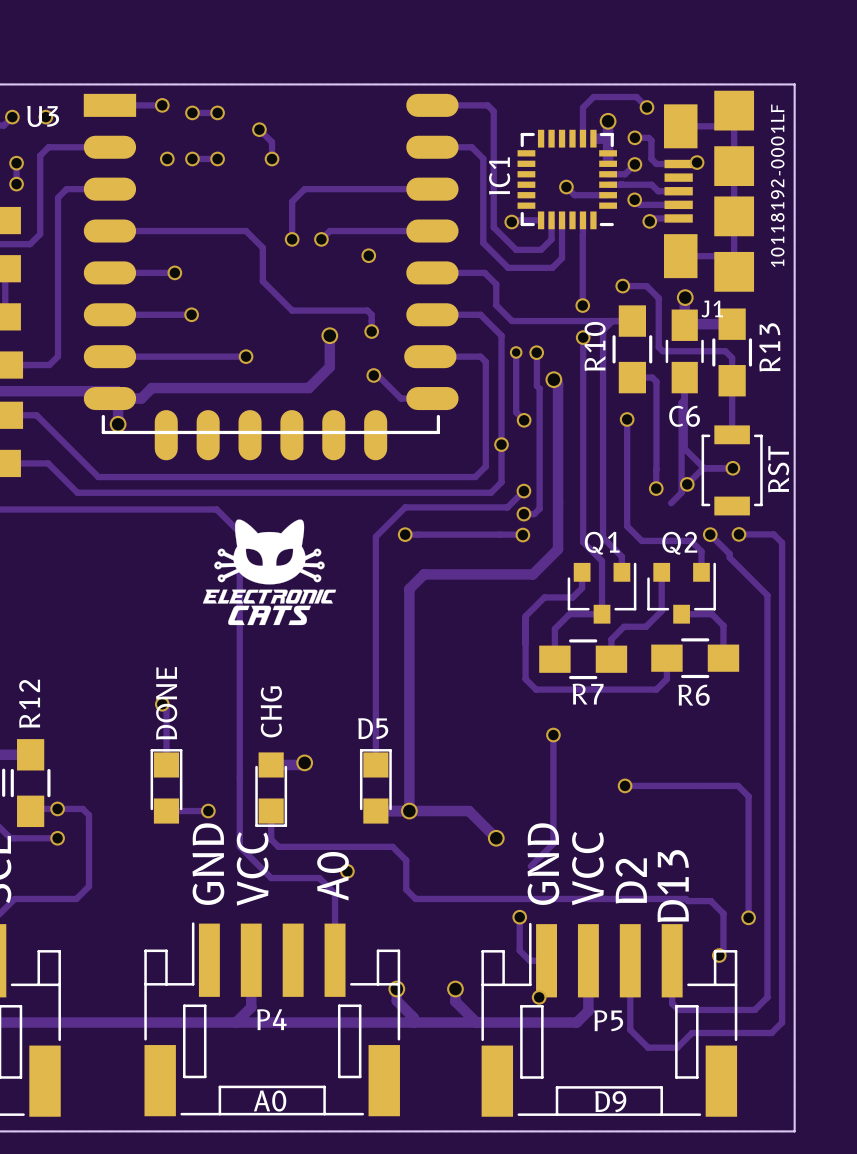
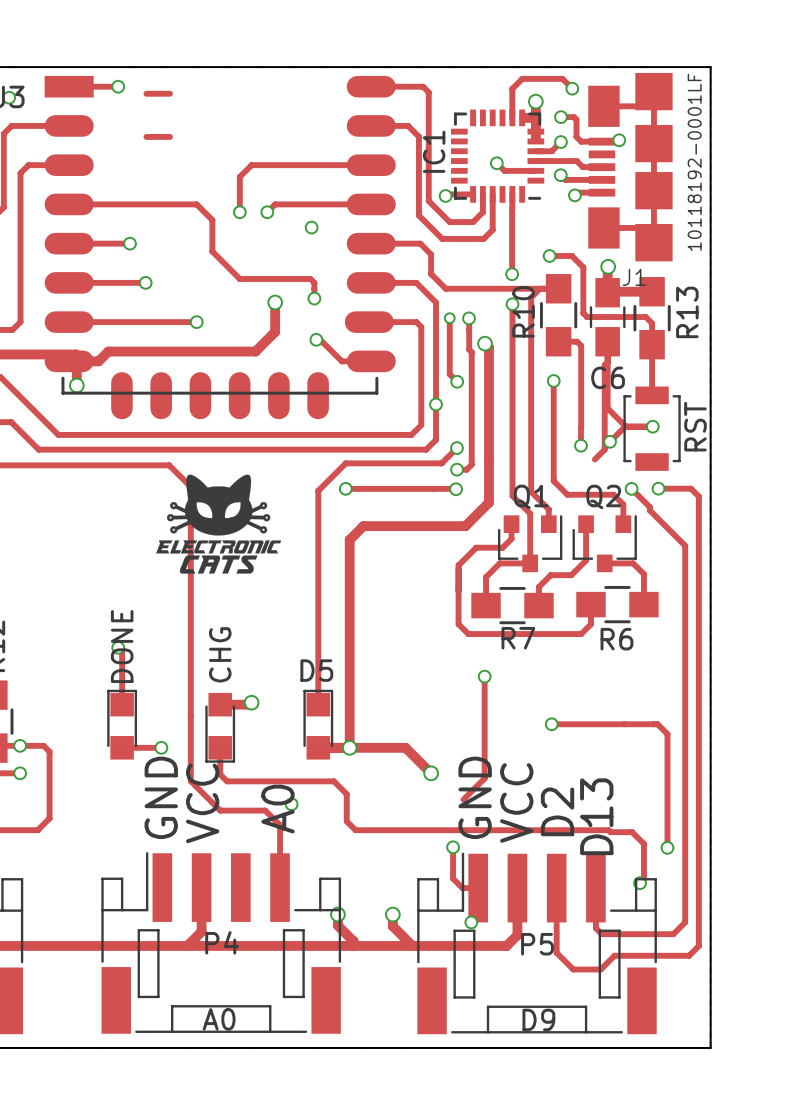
via: (192, 112) -> none
via: (217, 112) -> none
track: (259, 129) (272, 142) (272, 158) -> none
via: (259, 129) -> none
via: (167, 158) -> none
via: (192, 158) -> none
via: (217, 158) -> none
via: (272, 158) -> none

